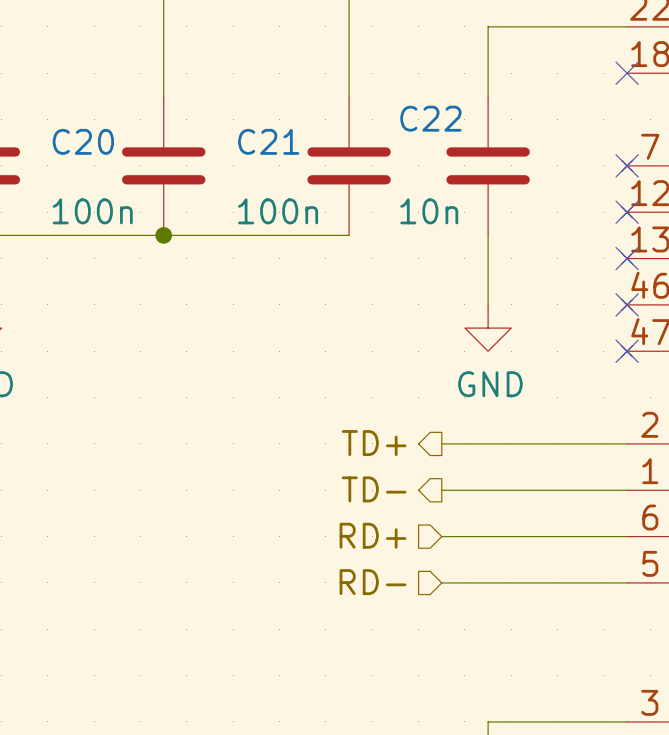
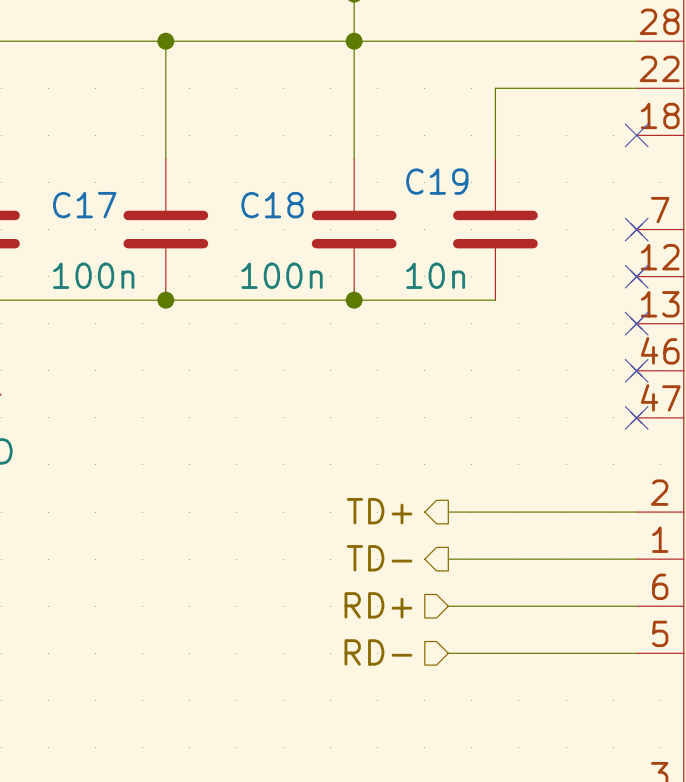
C22 name: C22 (430, 118) -> C19 (437, 181)
C20 name: C20 (83, 141) -> C17 (84, 205)
C21 name: C21 (268, 141) -> C18 (272, 205)
junction: none -> (354, 300)
wire: (488, 235) (488, 304) -> (495, 300) (354, 300)
power symbol: GND (488, 328) -> none

